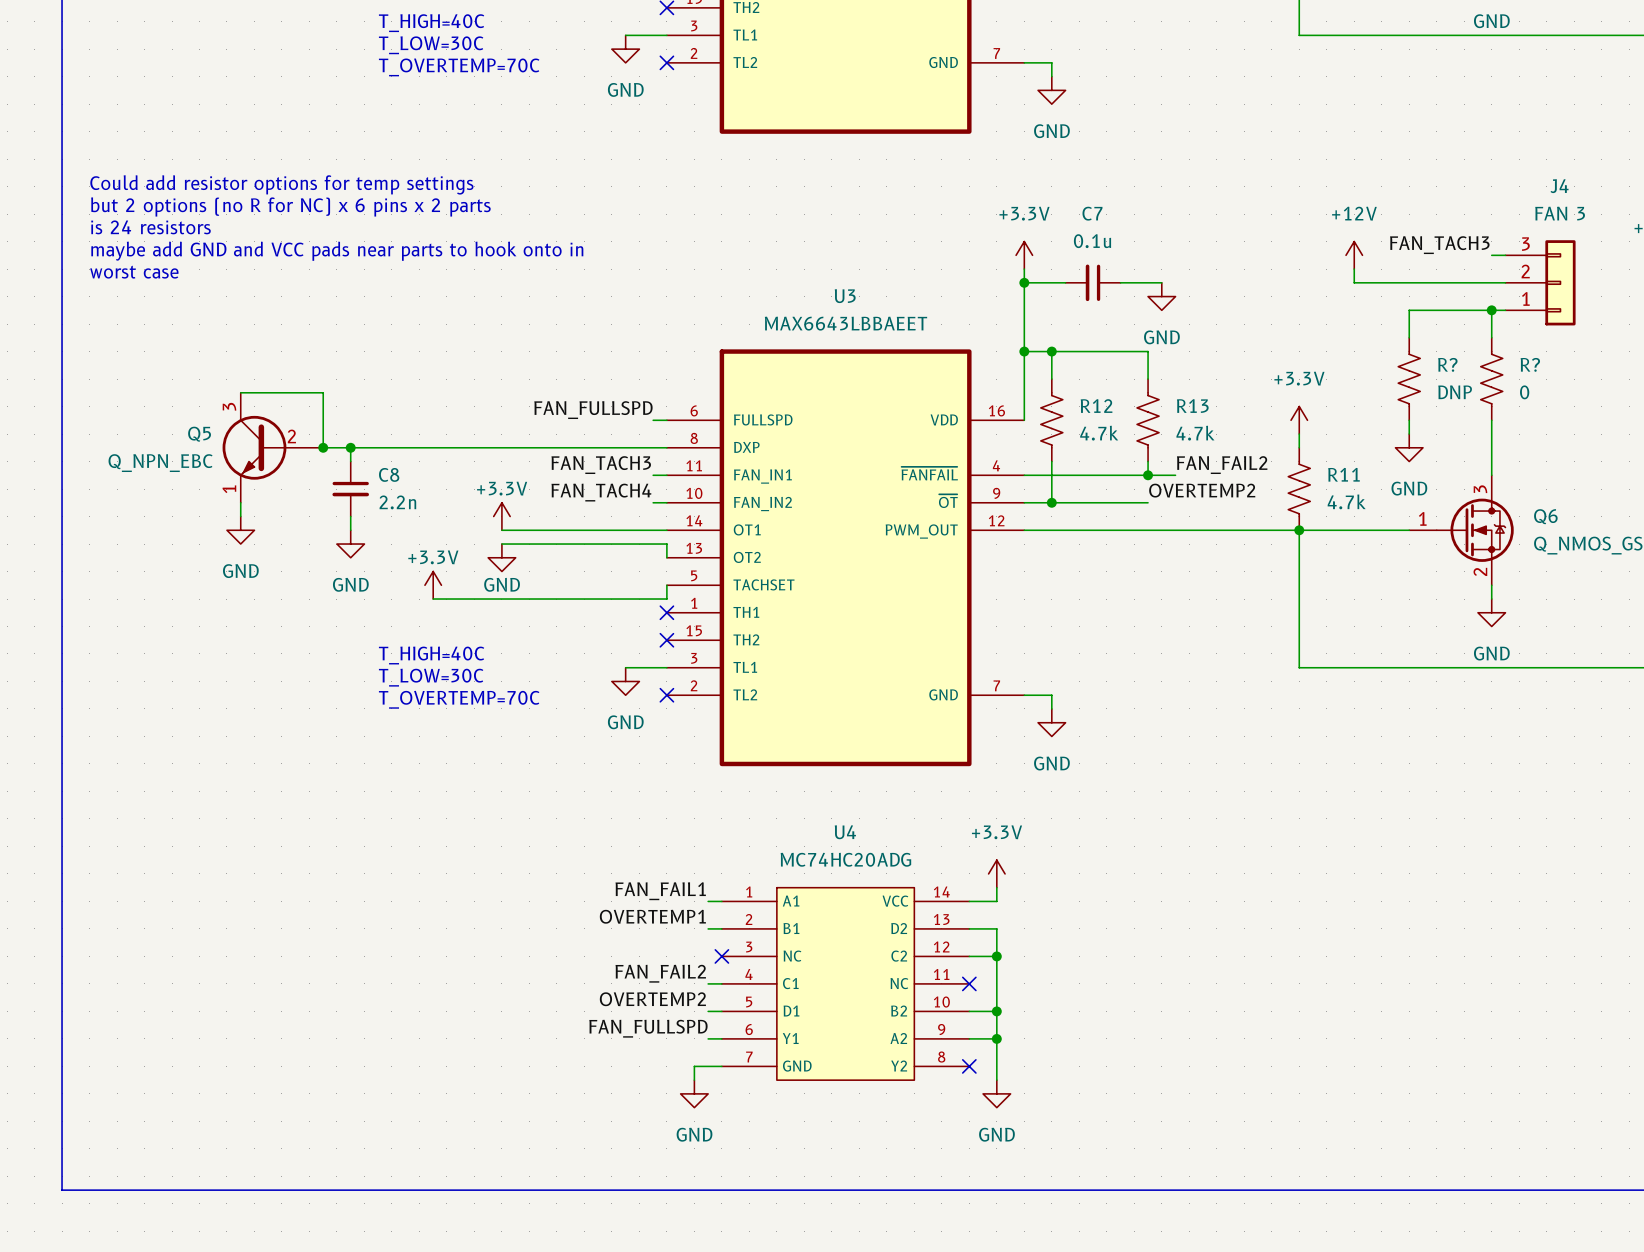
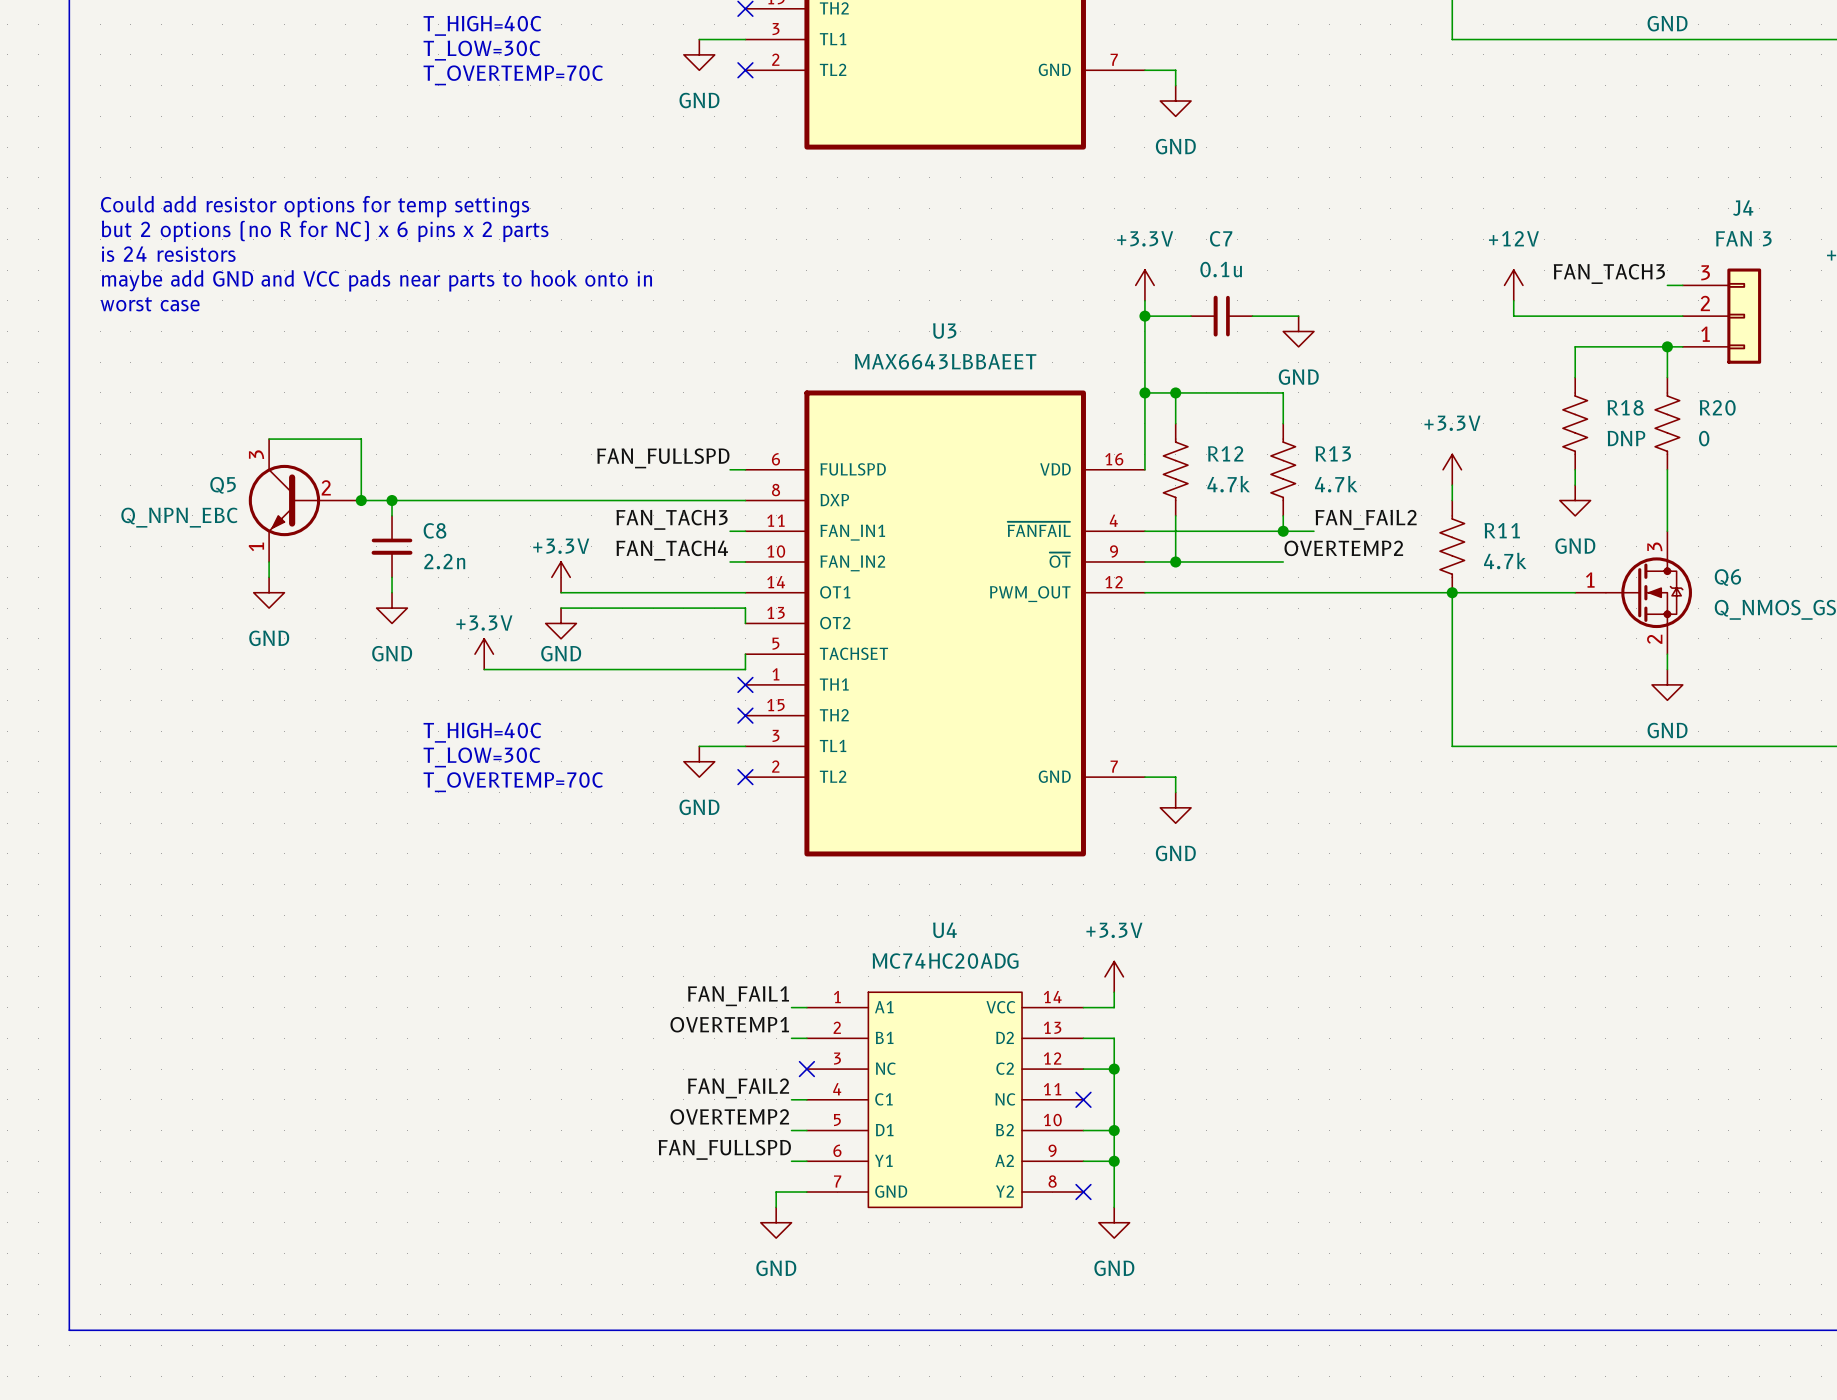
R? name: R? (1447, 364) -> R18 (1625, 407)
R? name: R? (1530, 364) -> R20 (1717, 407)

